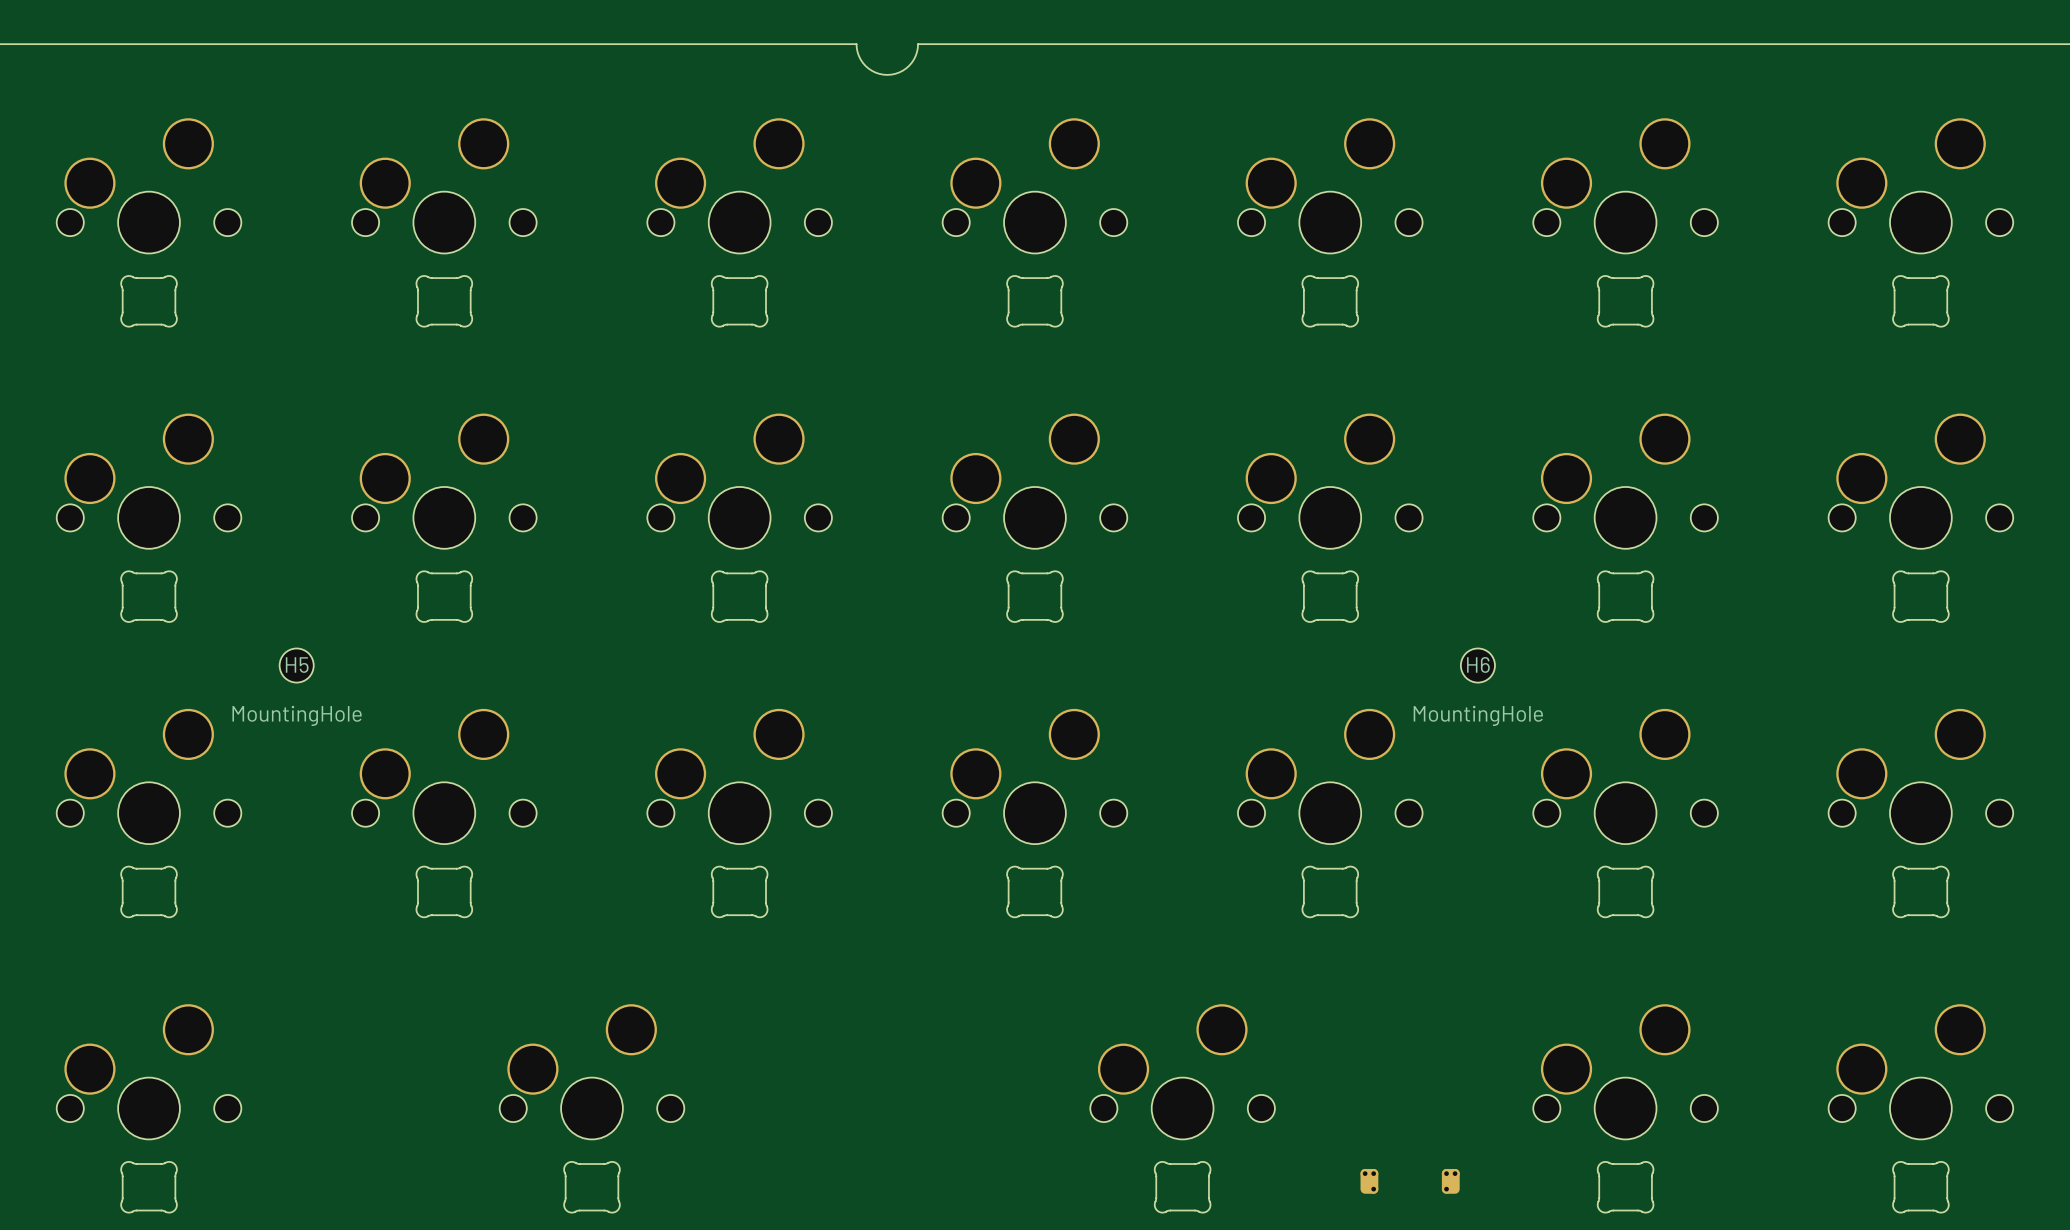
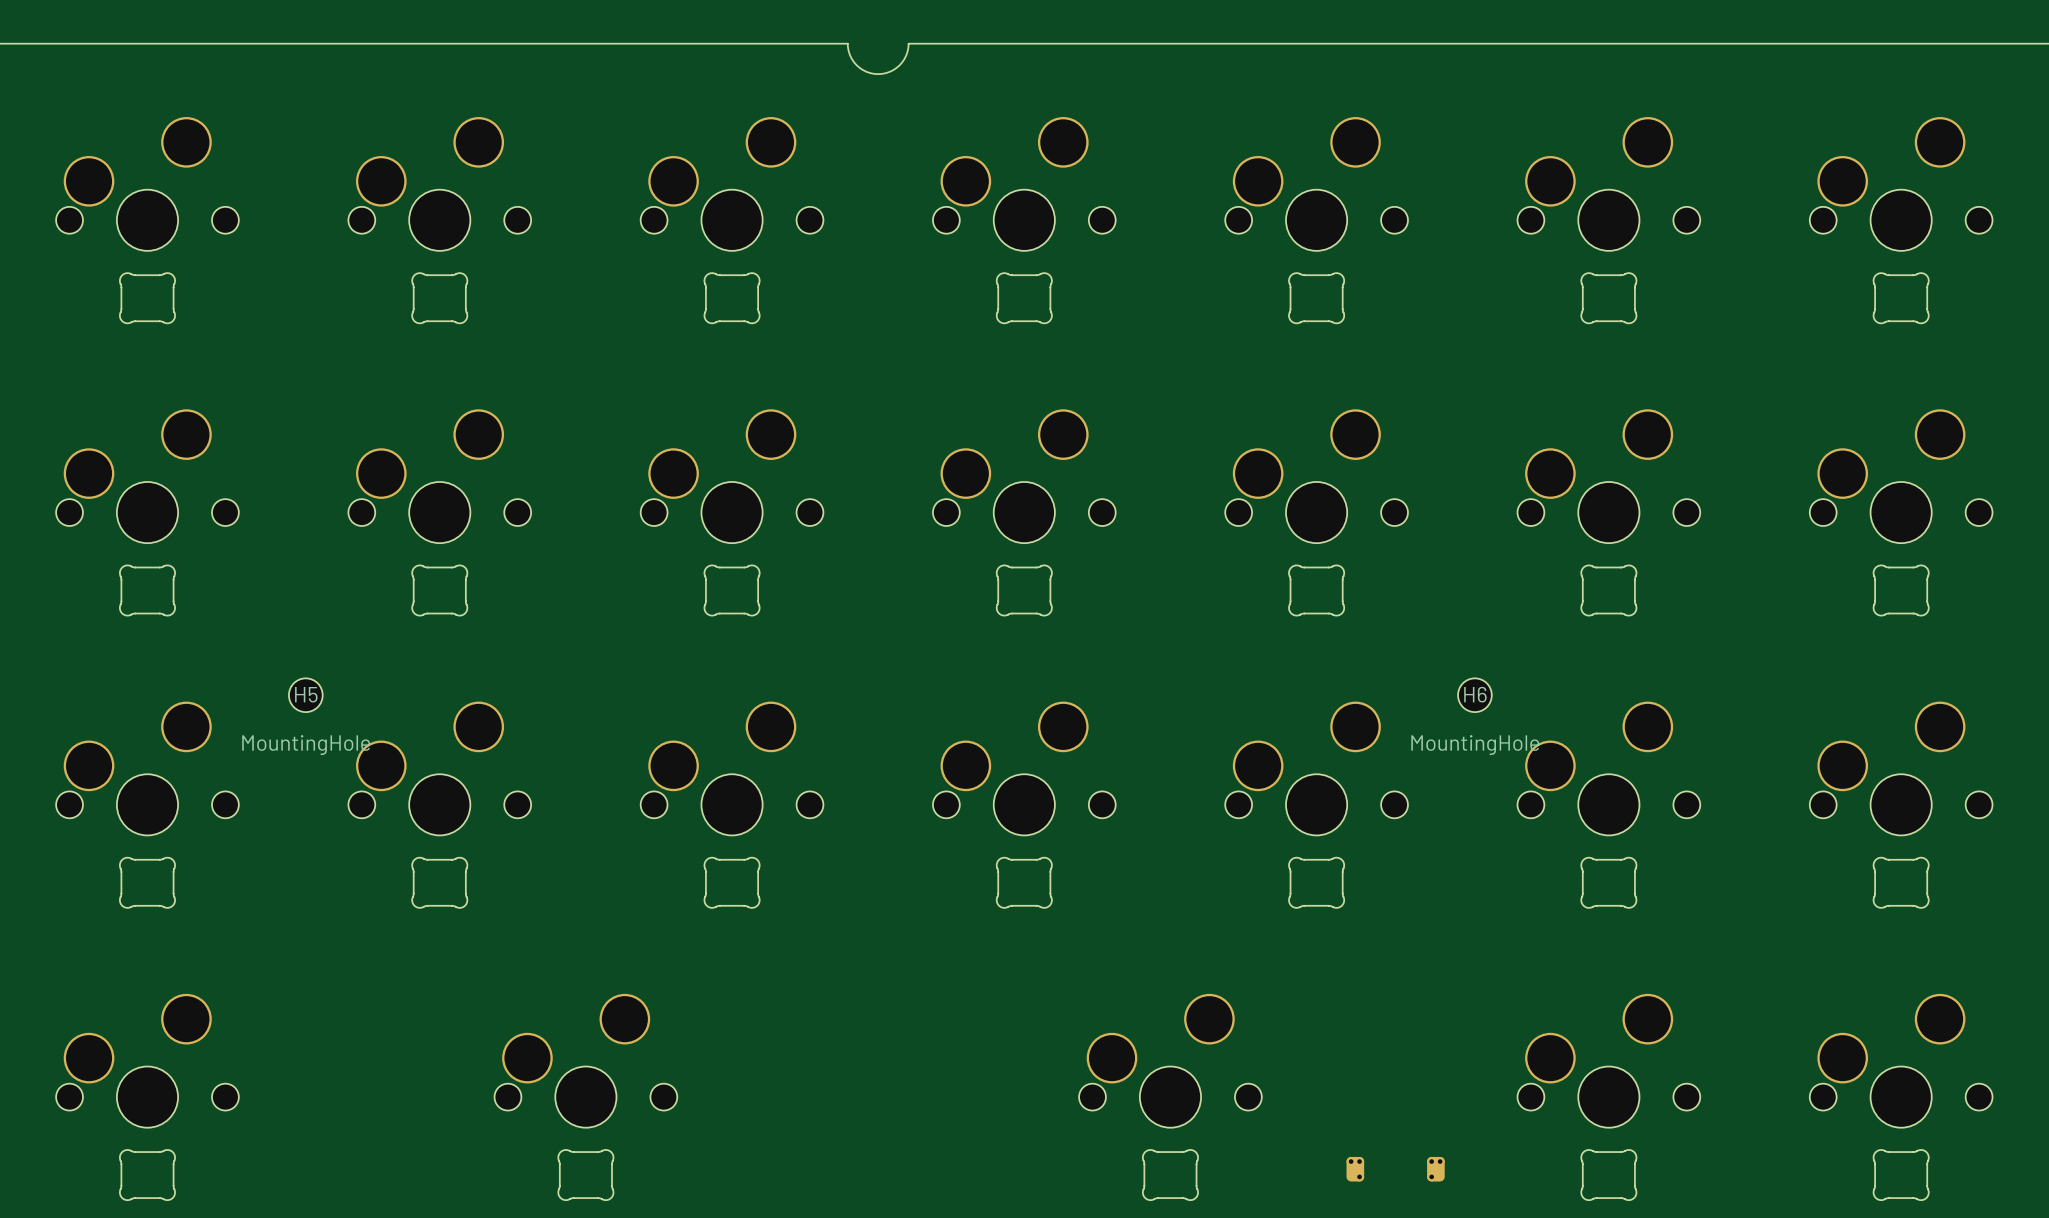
H5 position: (296, 665) -> (305, 695)
H6 position: (1477, 665) -> (1474, 695)

